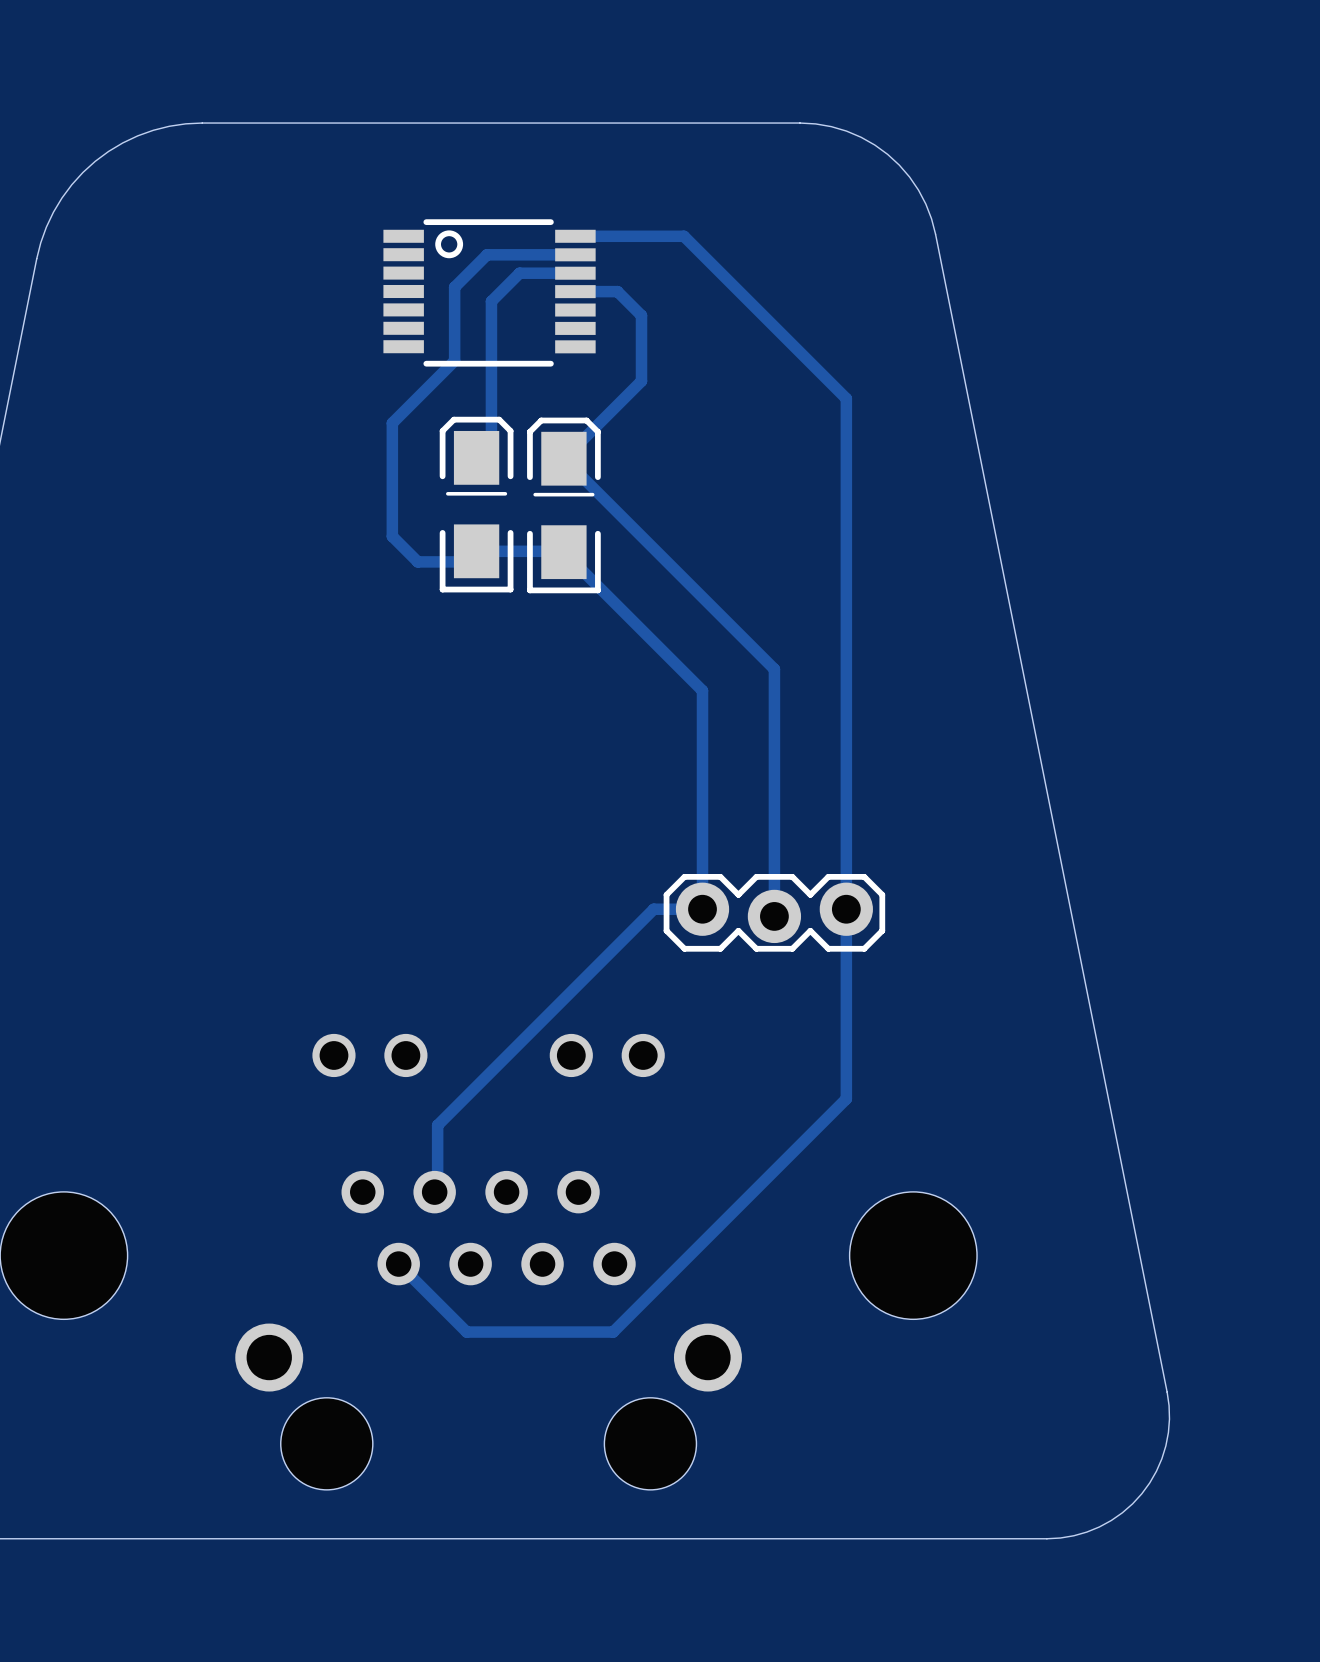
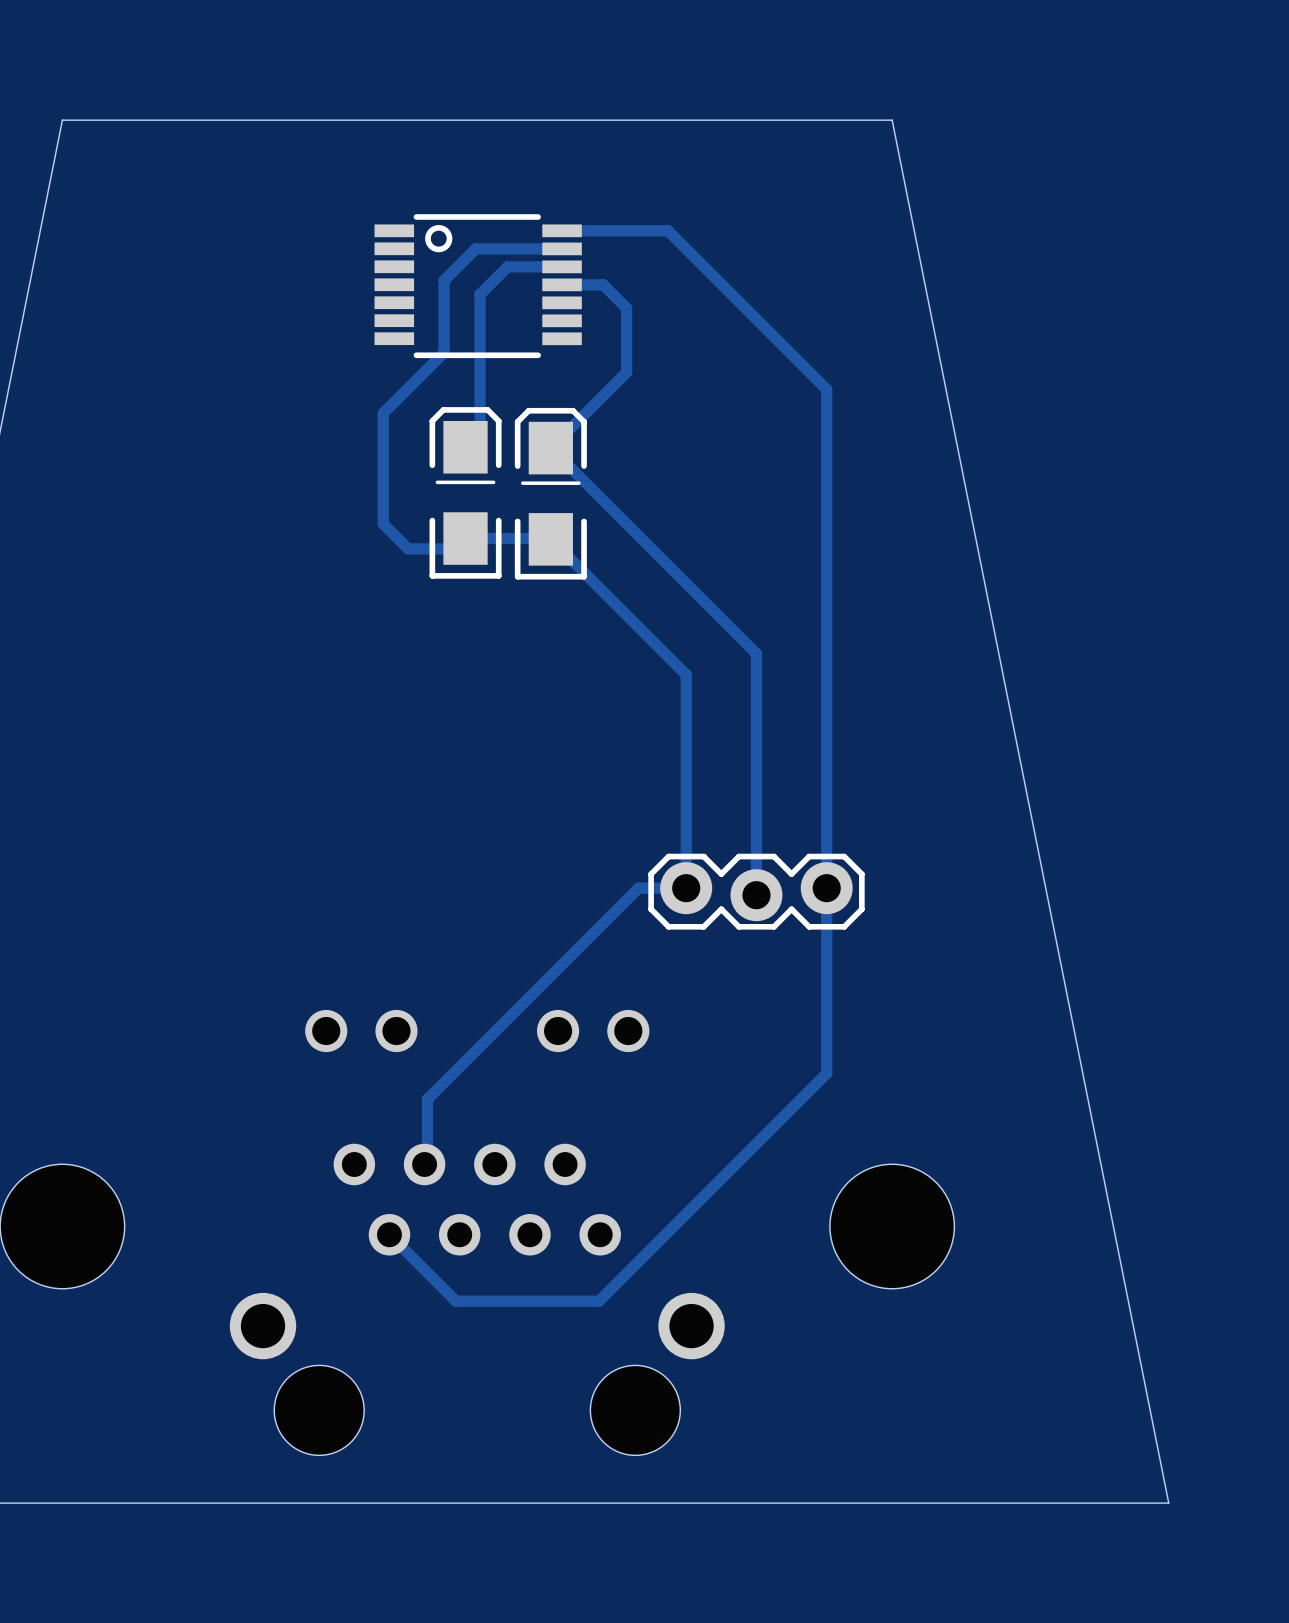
board edge: (202, 123) (169, 126) (153, 130) (122, 142) (95, 161) (71, 184) (61, 197) (46, 227) (36, 258) -> (197, 120) (62, 120) (35, 252)
board edge: (799, 123) (815, 123) (846, 131) (874, 145) (887, 154) (909, 177) (918, 190) (931, 218) (935, 234) -> (781, 120) (892, 120) (913, 228)
board edge: (1167, 1392) (1169, 1419) (1165, 1445) (1156, 1471) (1141, 1493) (1122, 1512) (1099, 1526) (1073, 1535) (1046, 1538) -> (1140, 1359) (1168, 1503) (1022, 1503)

